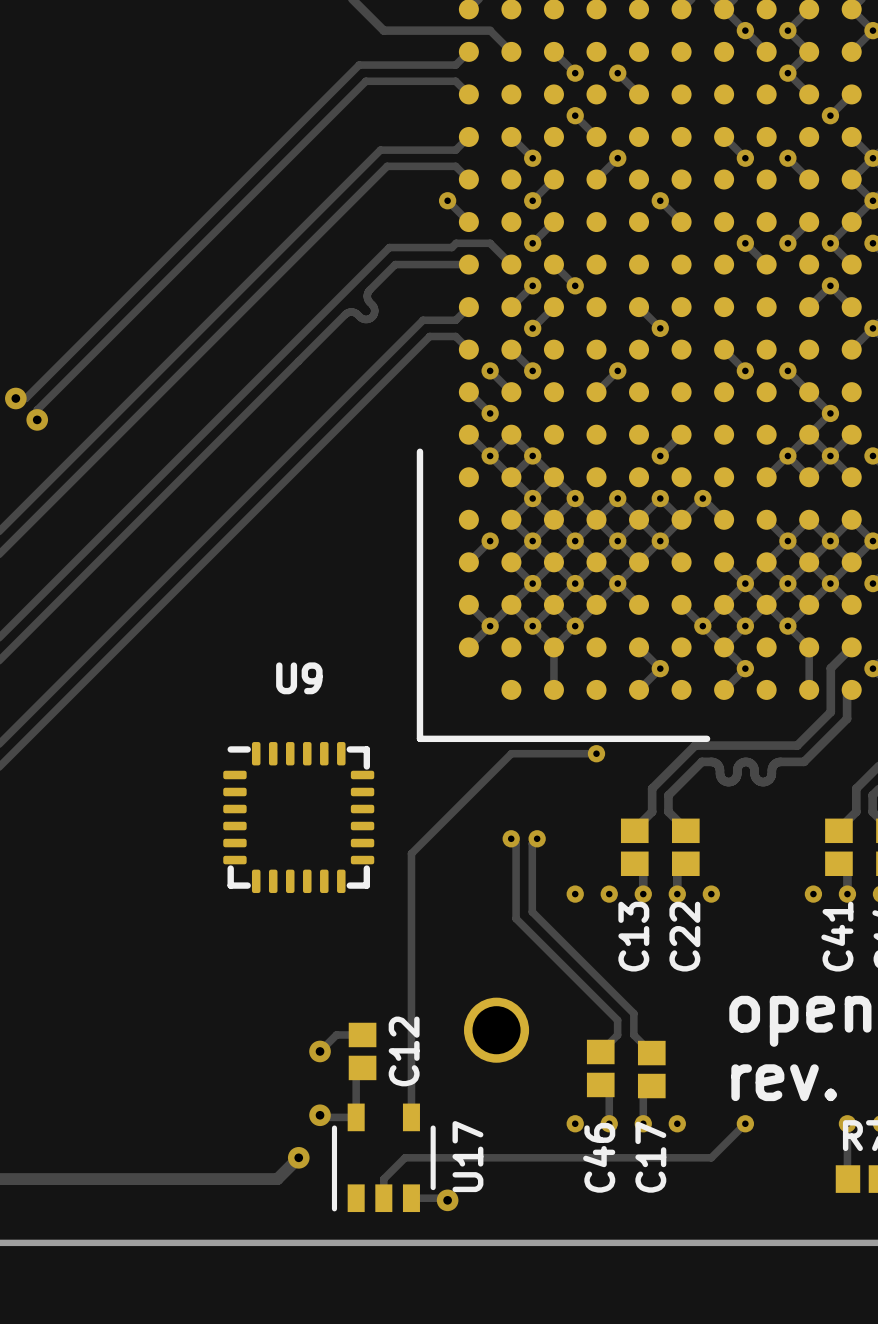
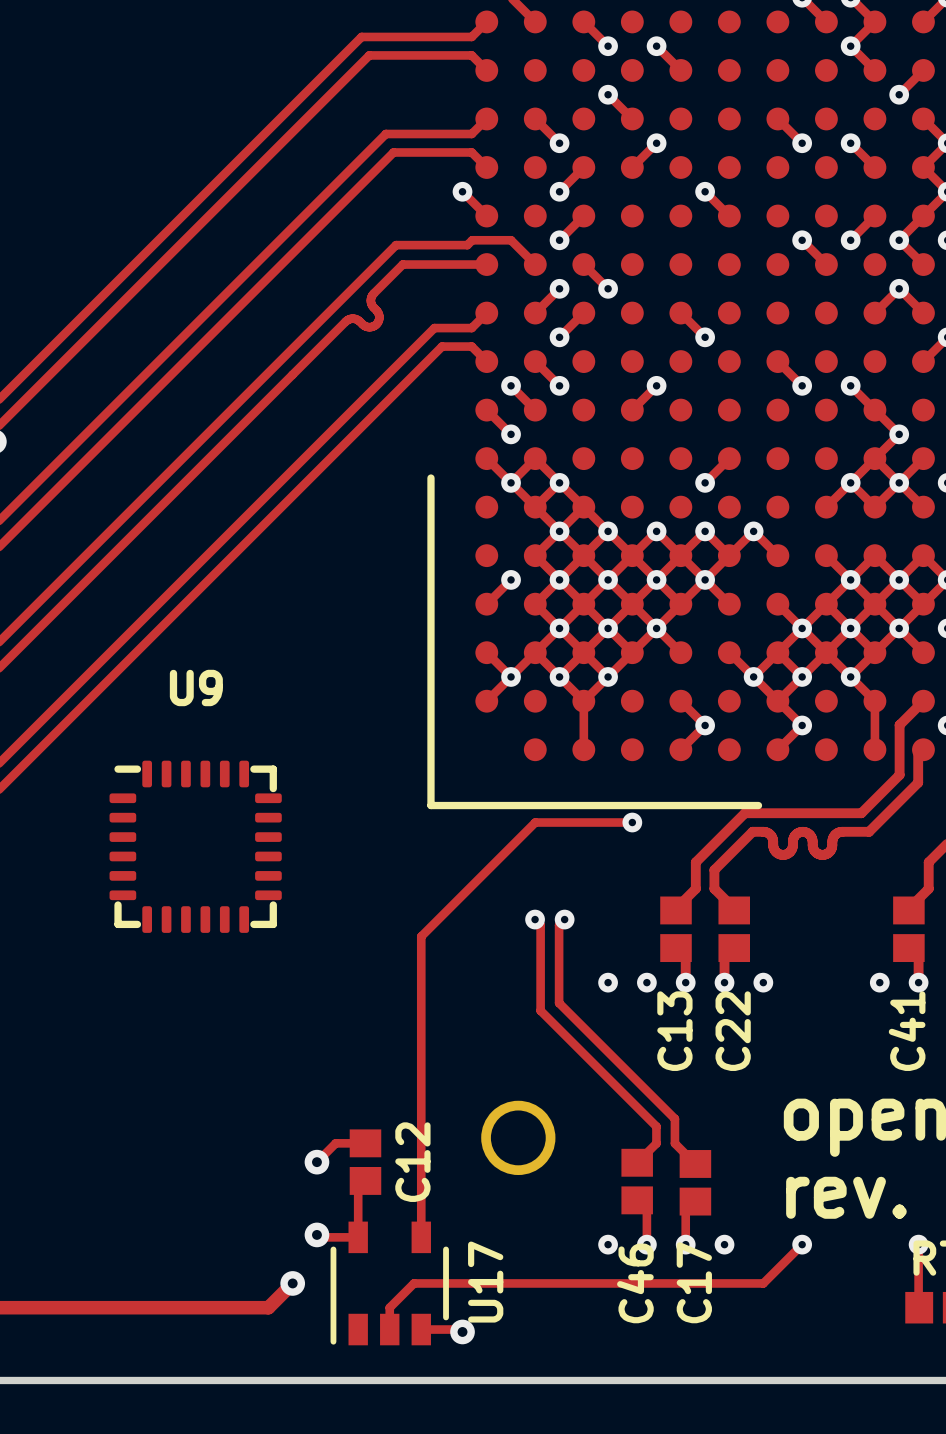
U9 position: (298, 817) -> (195, 846)

